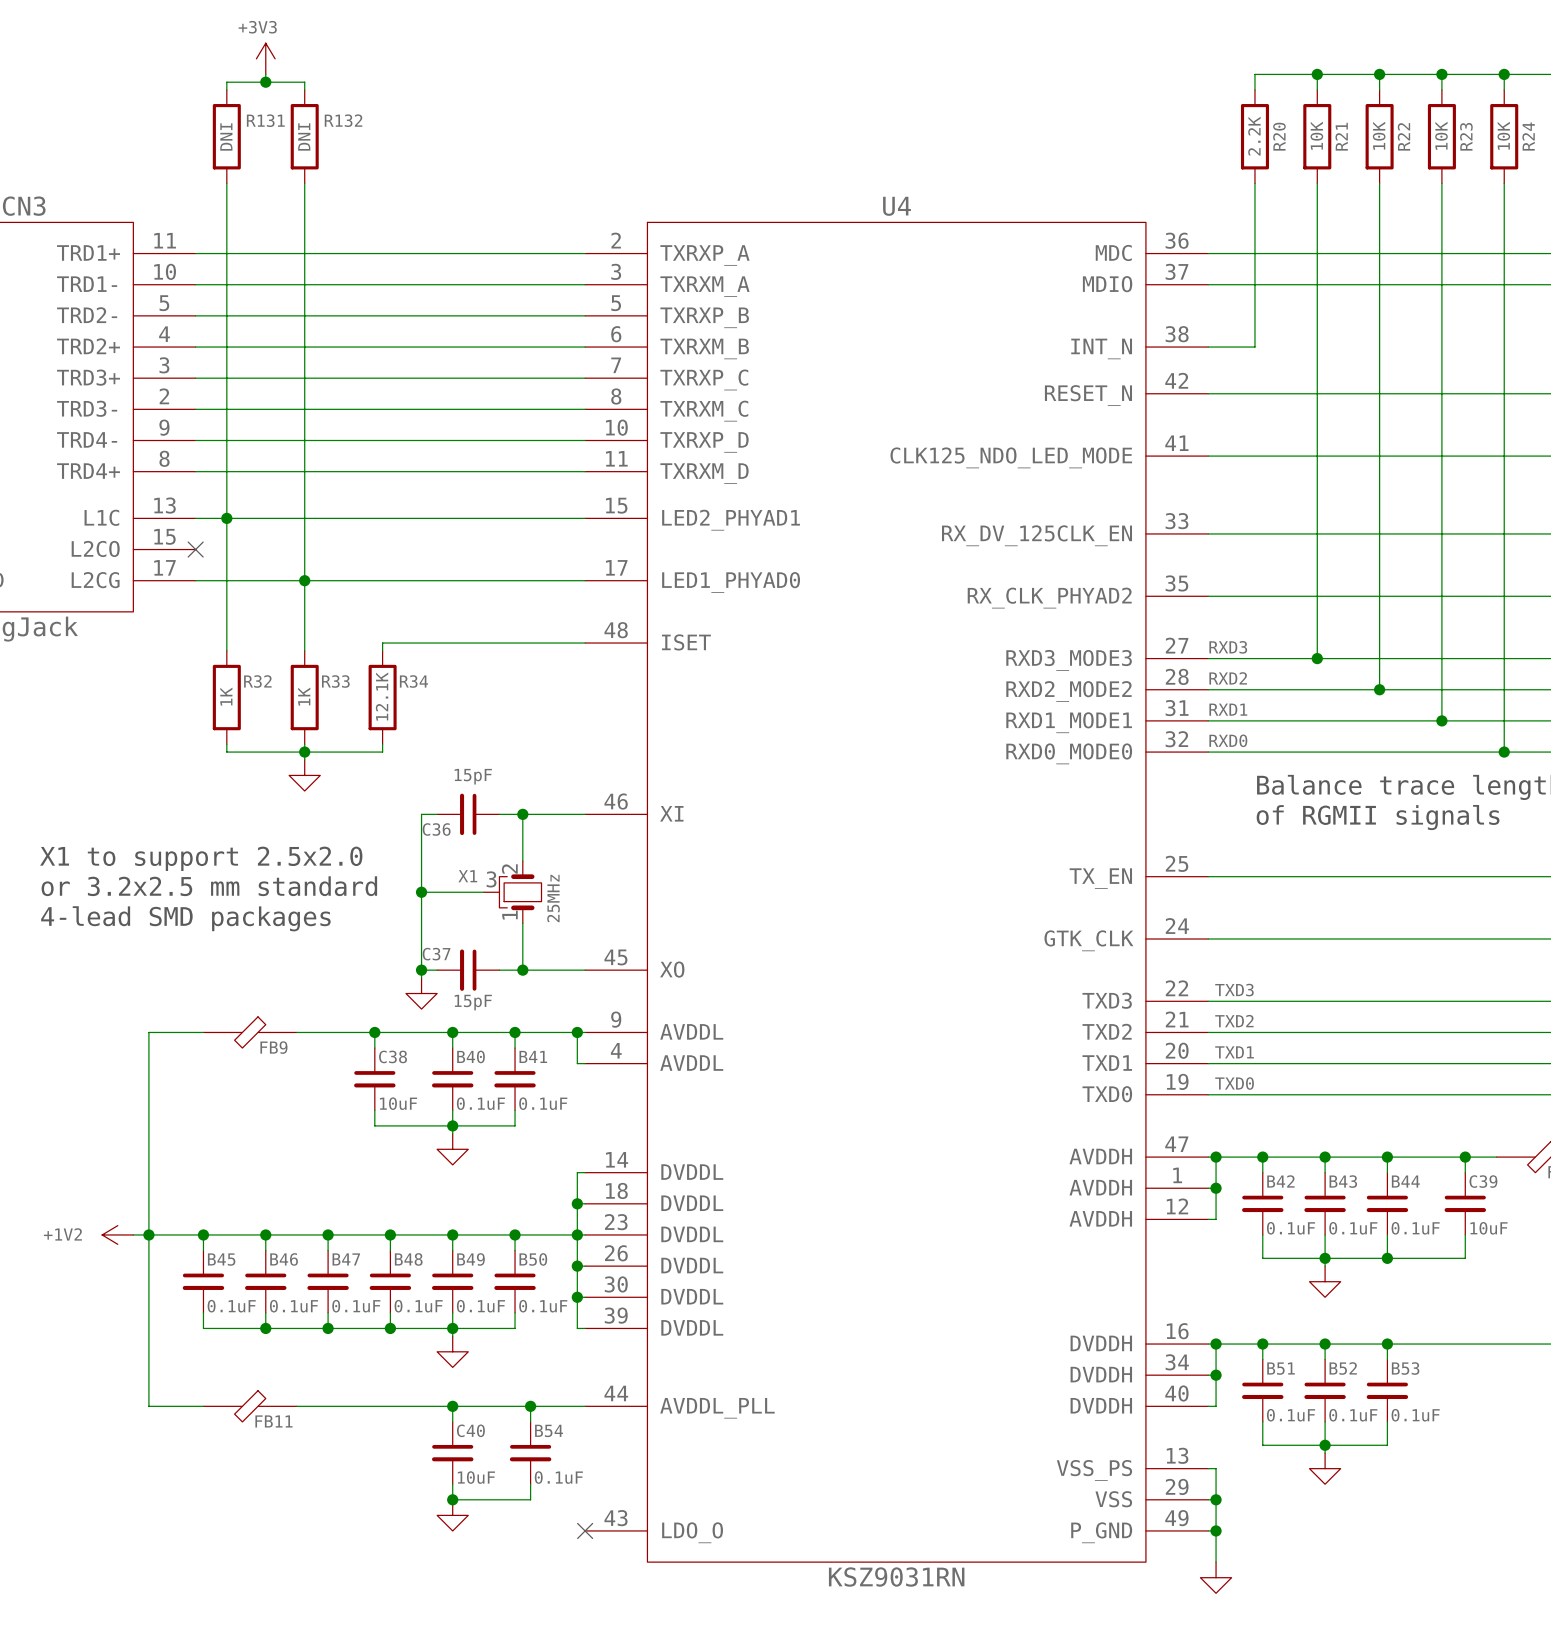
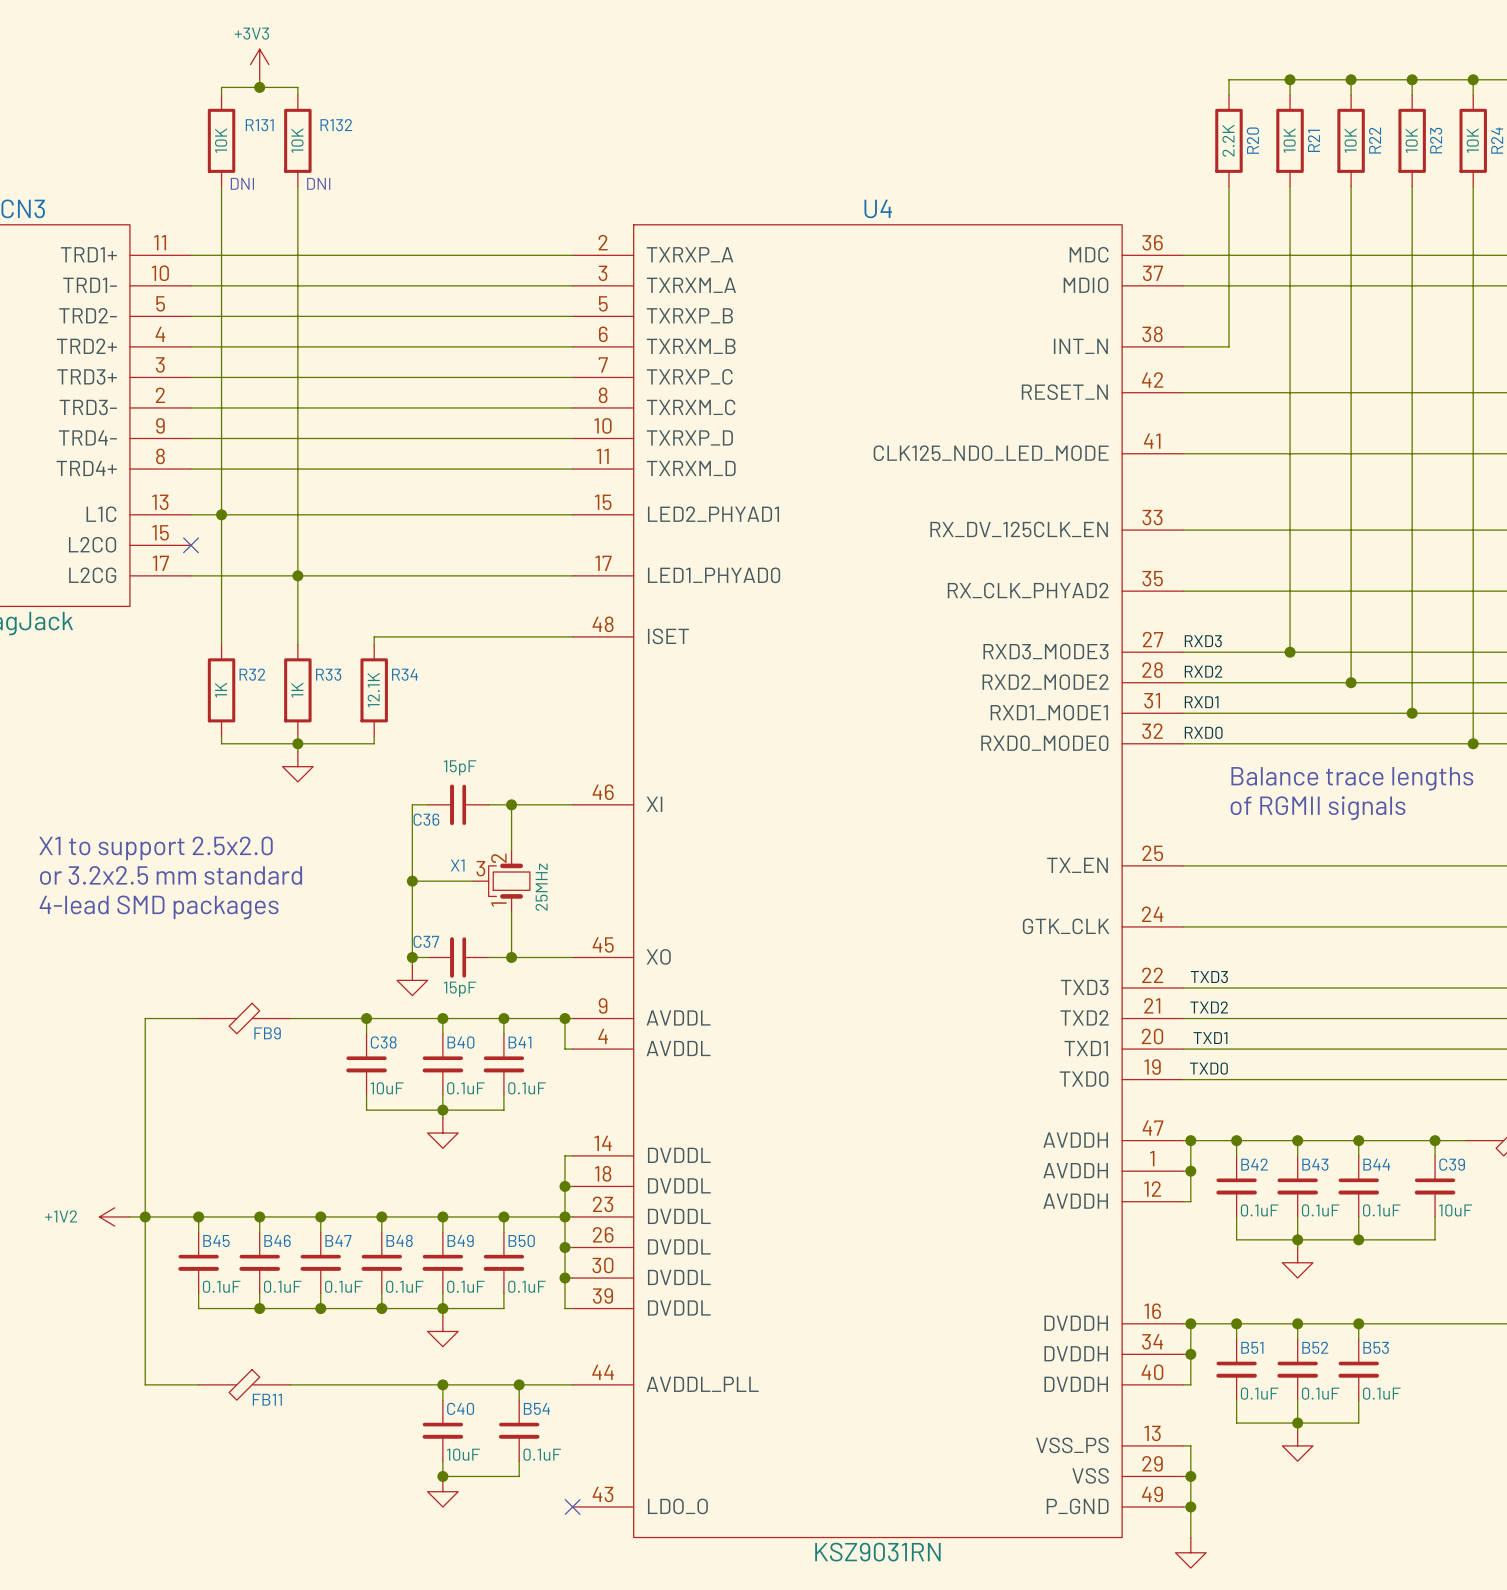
R131 value: DNI (226, 136) -> 10K (221, 140)
R132 value: DNI (304, 136) -> 10K (297, 140)
text: none -> DNI (242, 183)
text: none -> DNI (318, 183)

